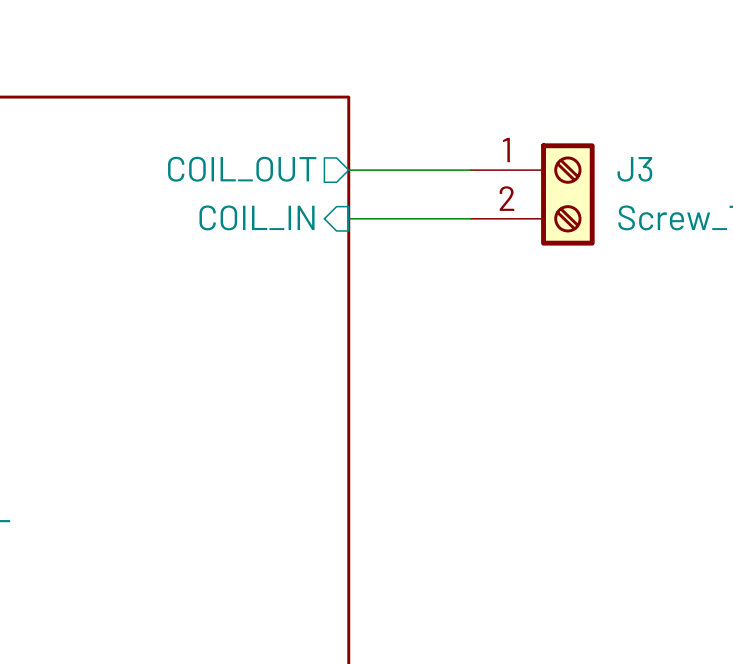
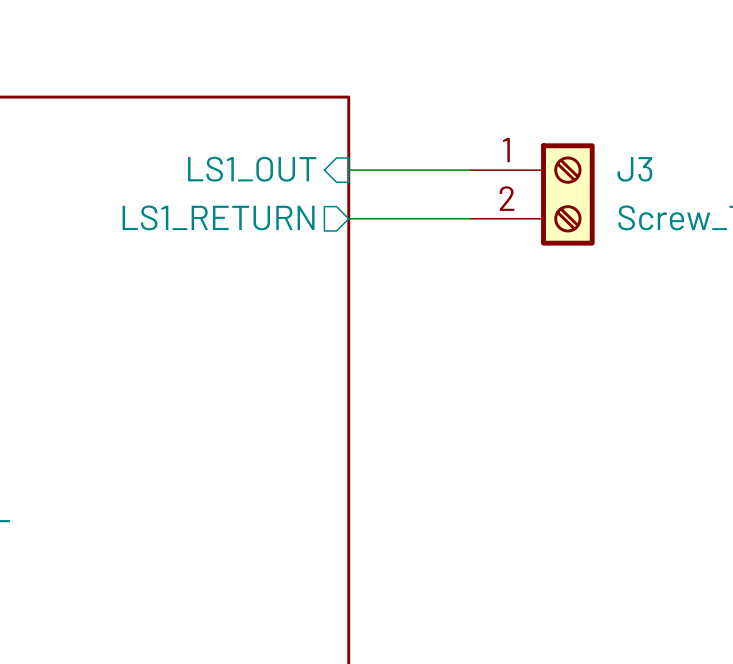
sheet pin shape: output (242, 169) -> input (252, 169)
sheet pin: COIL_OUT (242, 169) -> LS1_OUT (252, 169)
sheet pin shape: input (257, 217) -> output (218, 217)
sheet pin: COIL_IN (257, 217) -> LS1_RETURN (218, 217)

